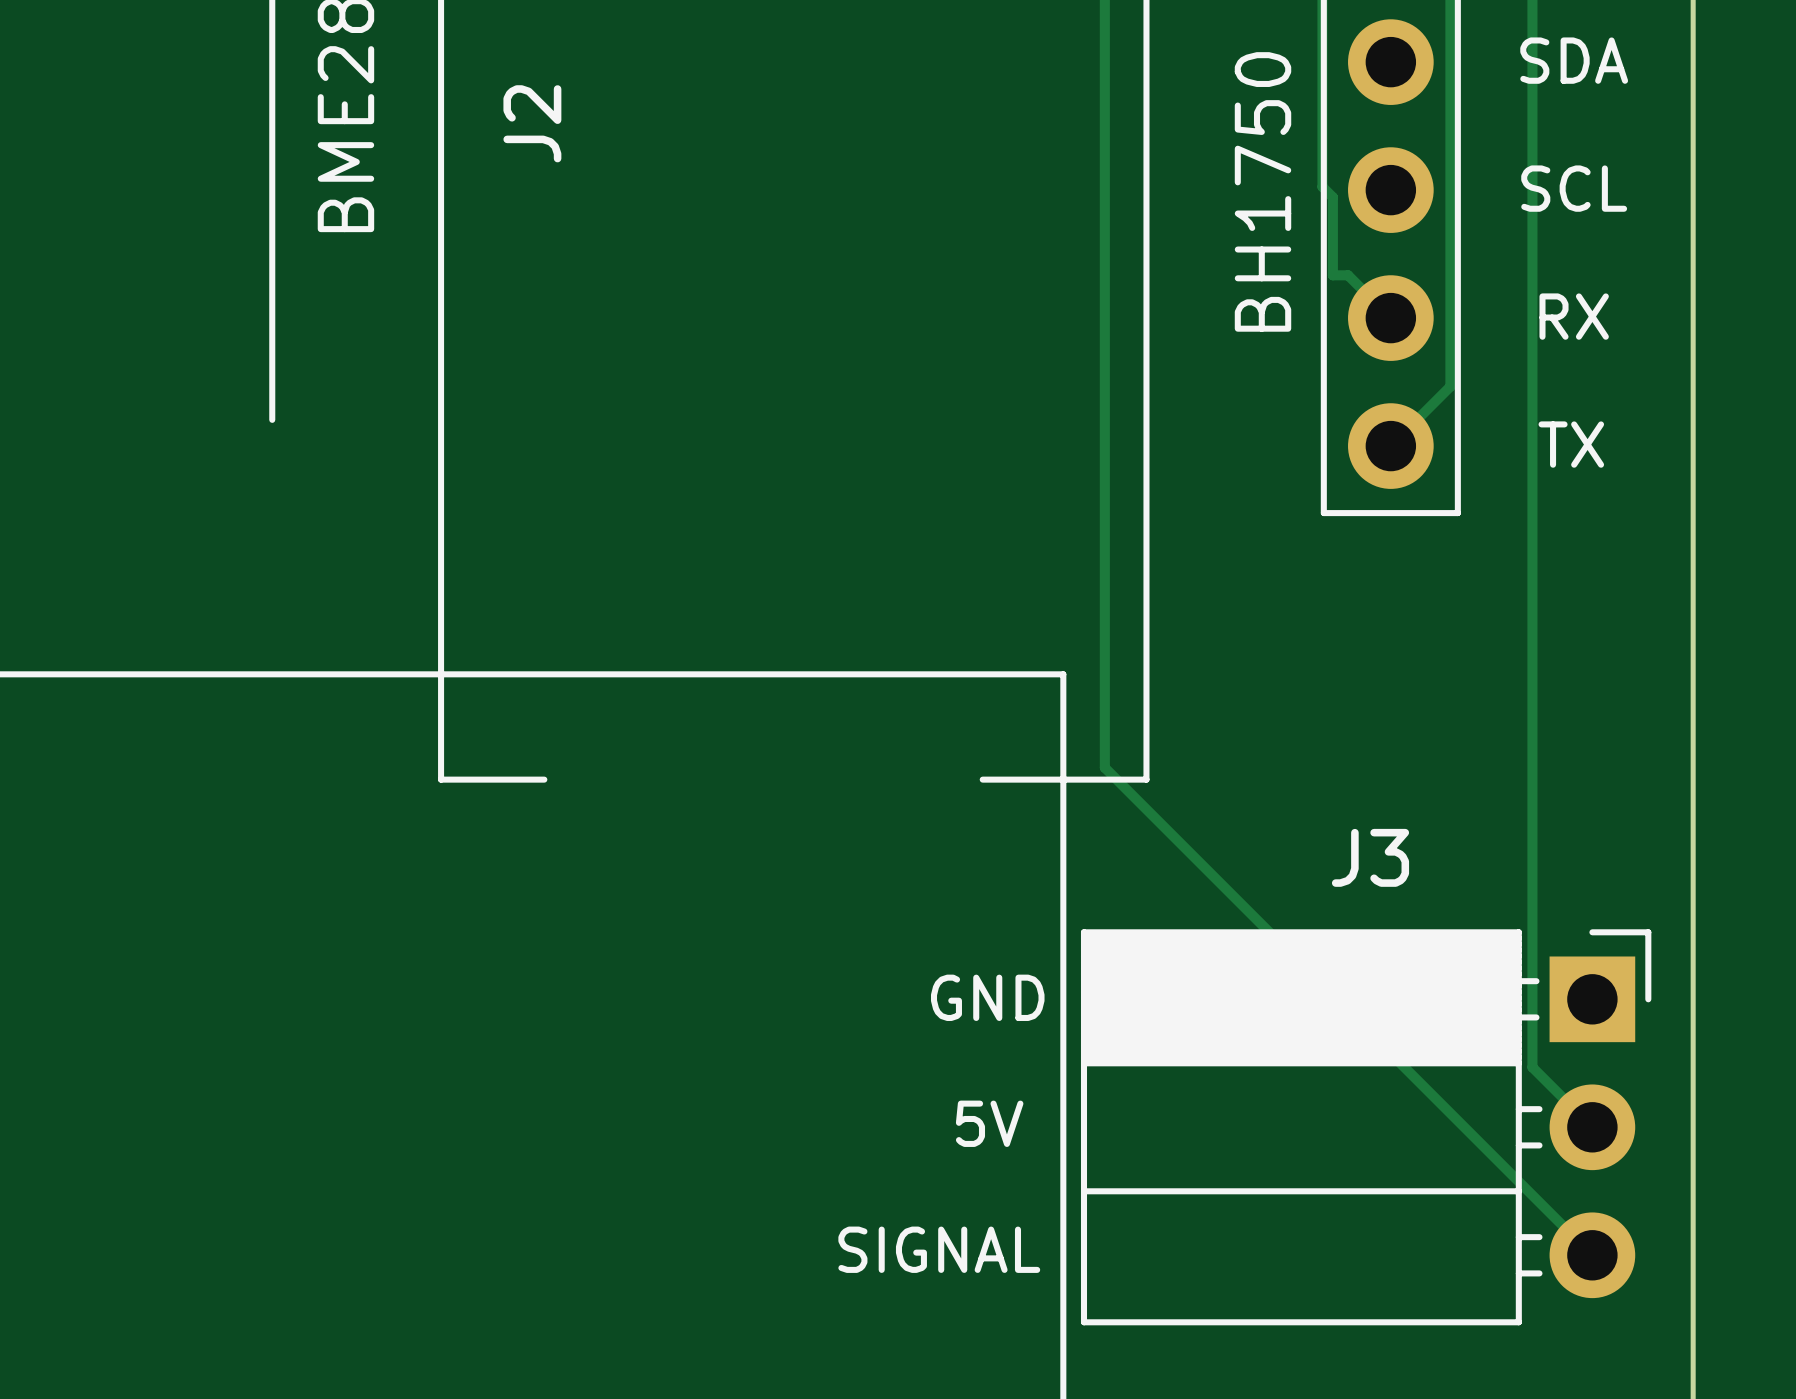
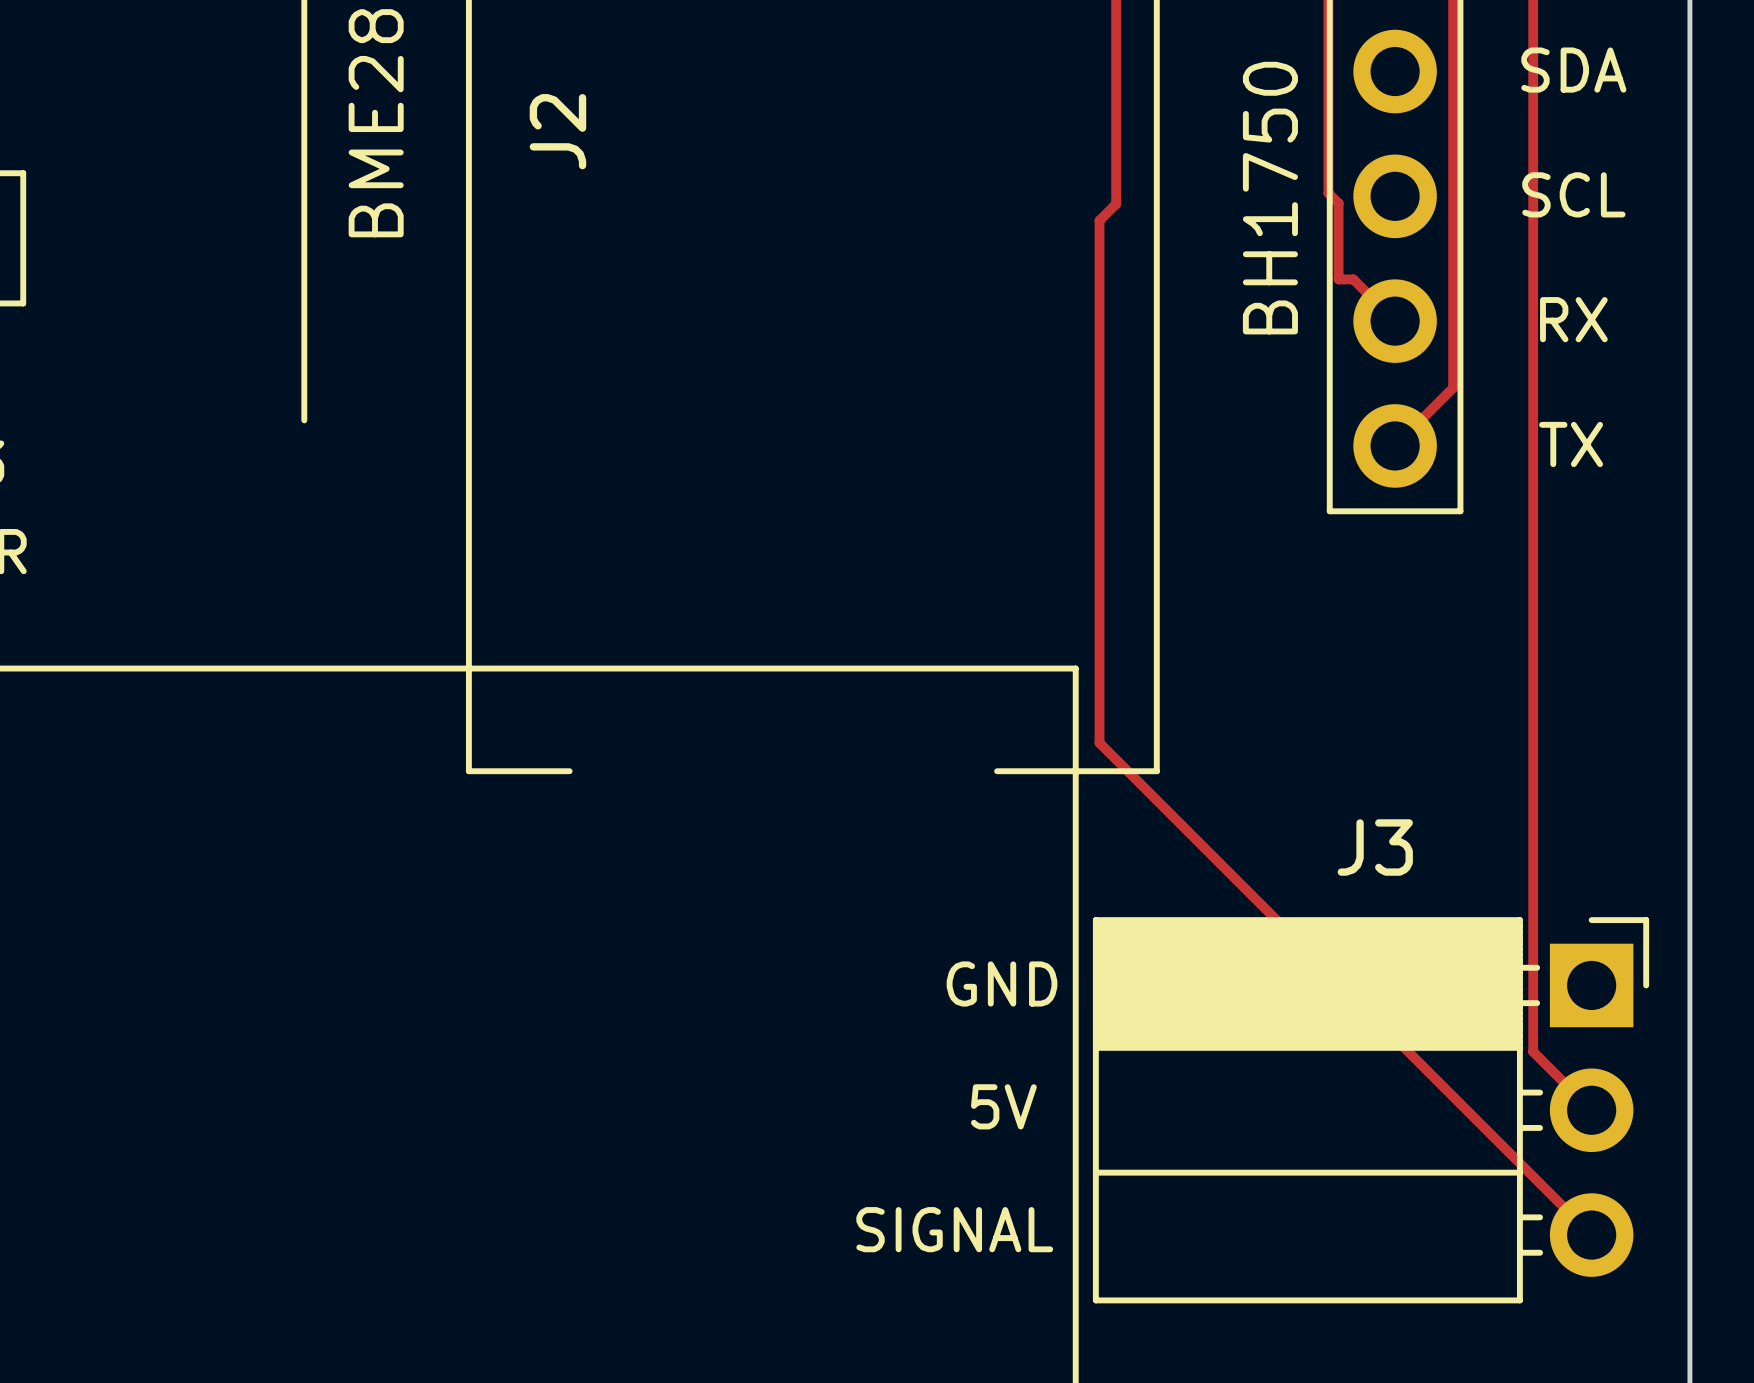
track: (1104, 197) (1104, 767) -> (1116, 203) (1099, 220) (1099, 742) (1116, 759)

